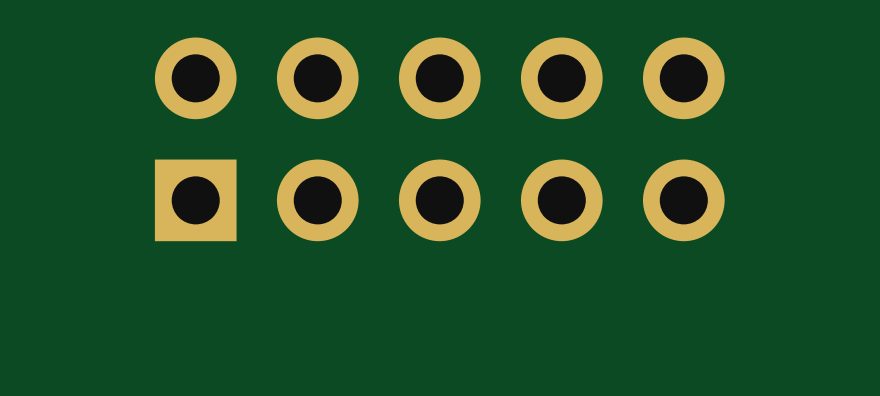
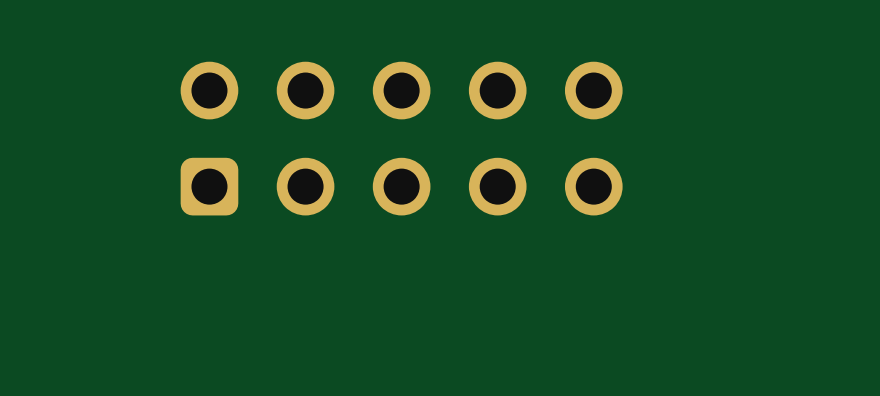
part footprint: [154, 37, 725, 242] -> [180, 61, 623, 216]

